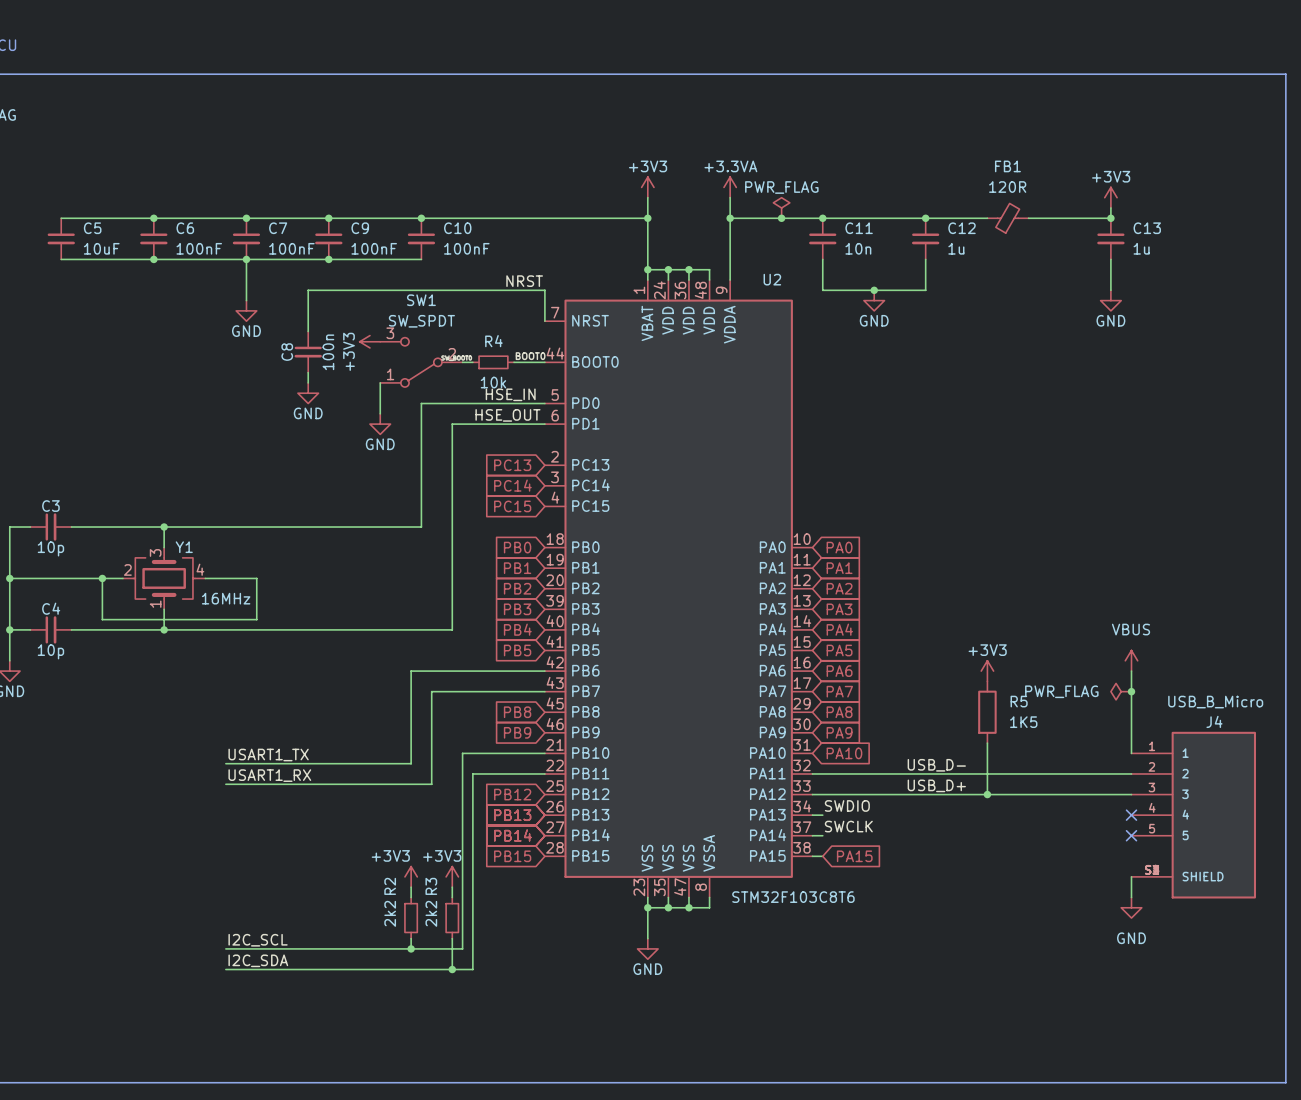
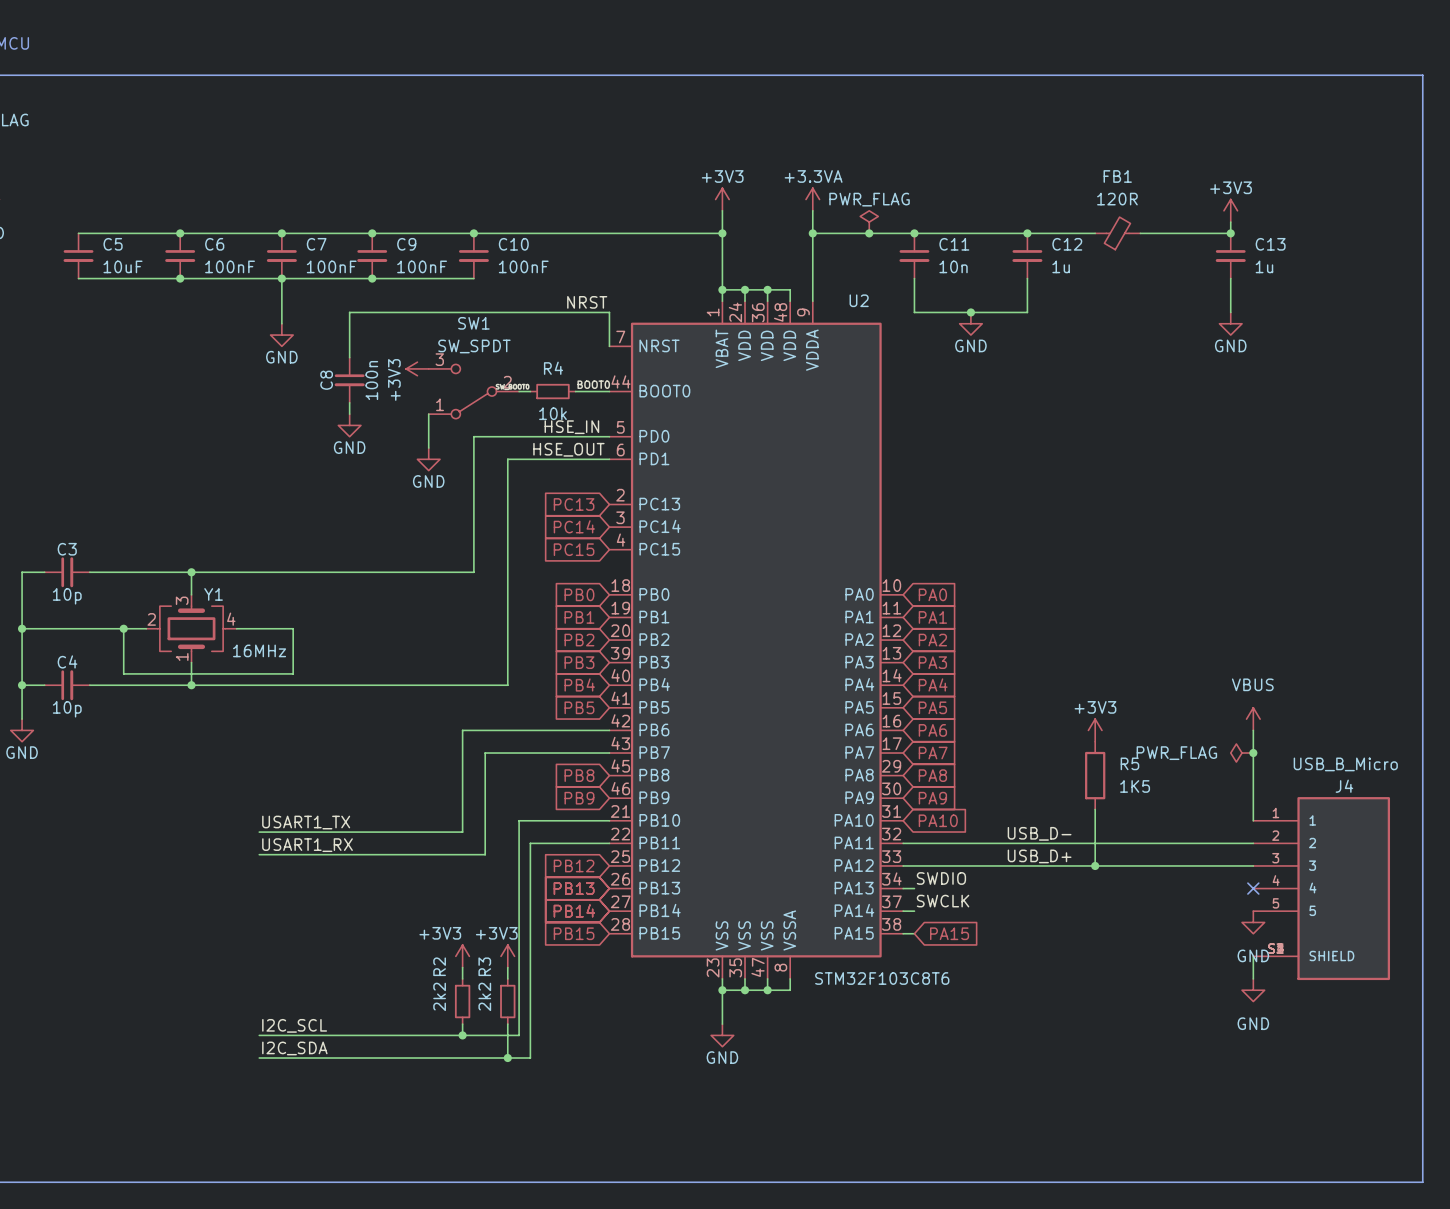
no-connect mark: (1131, 835) -> none
power symbol: none -> GND (1253, 922)

